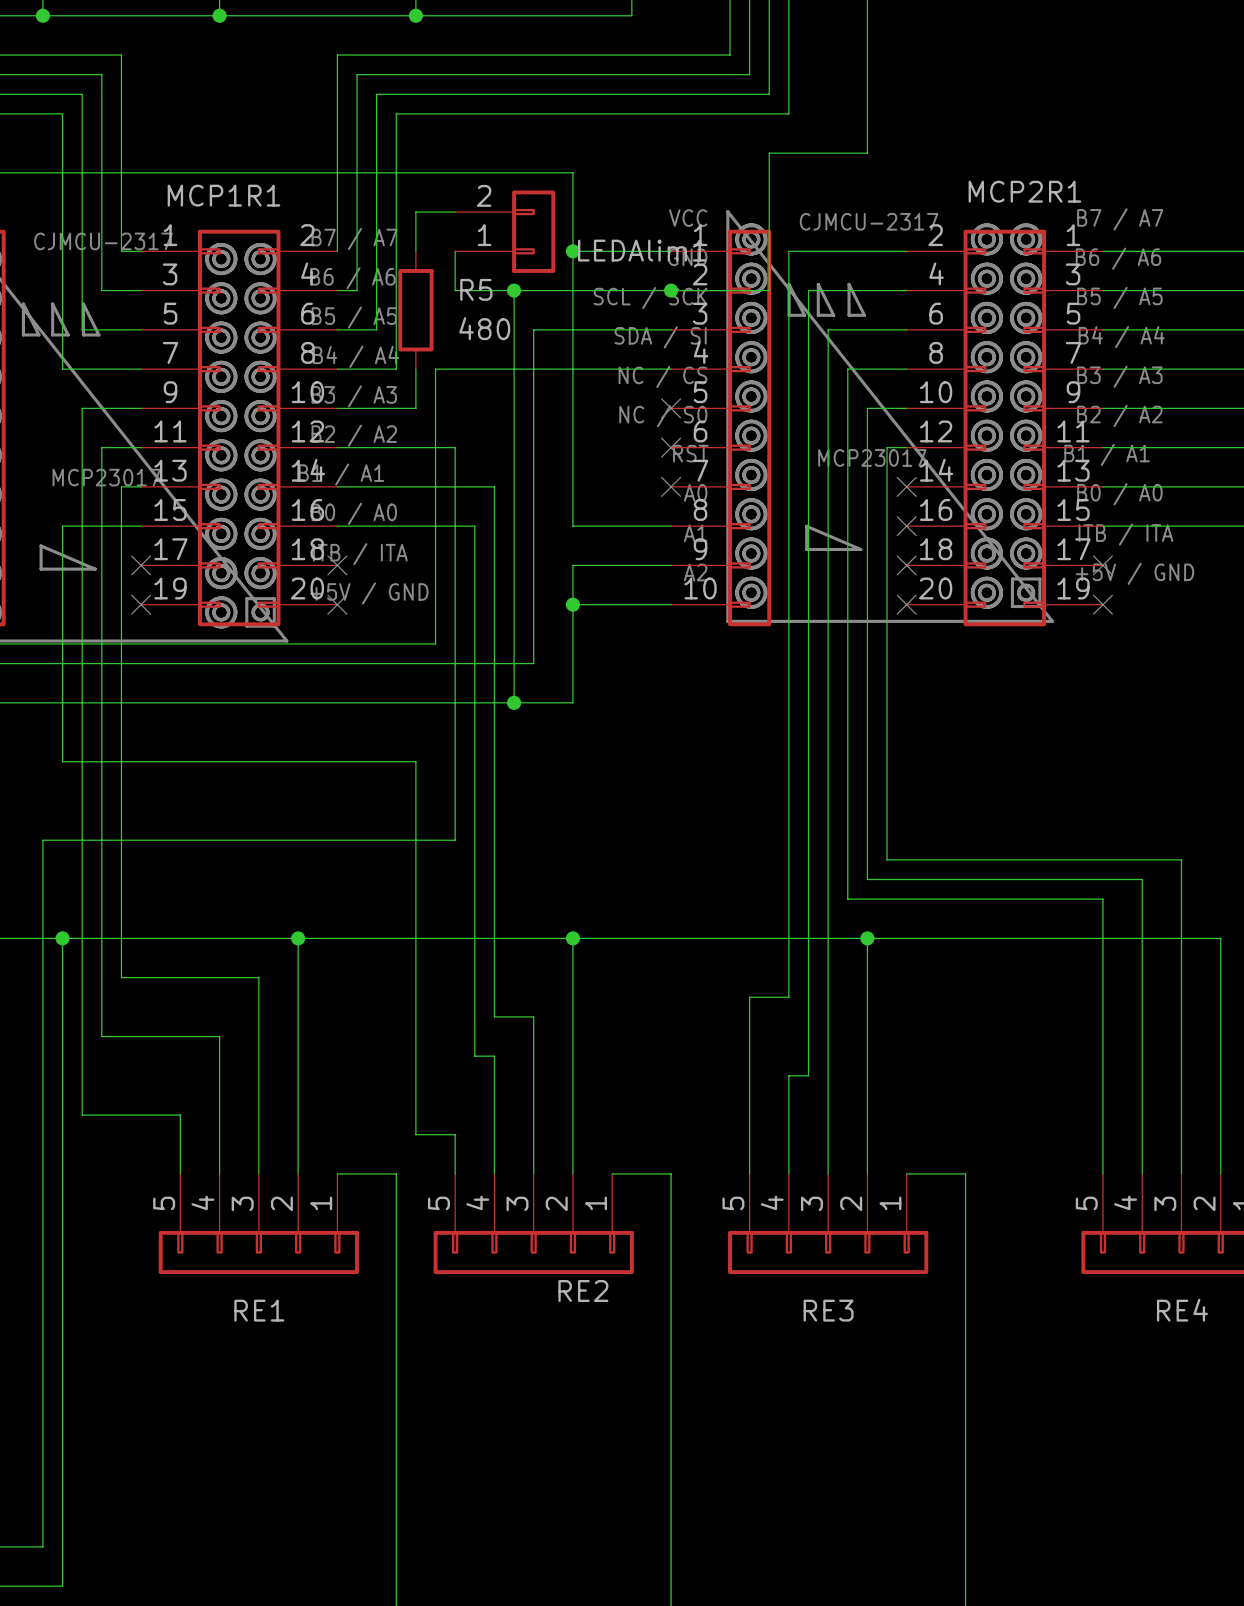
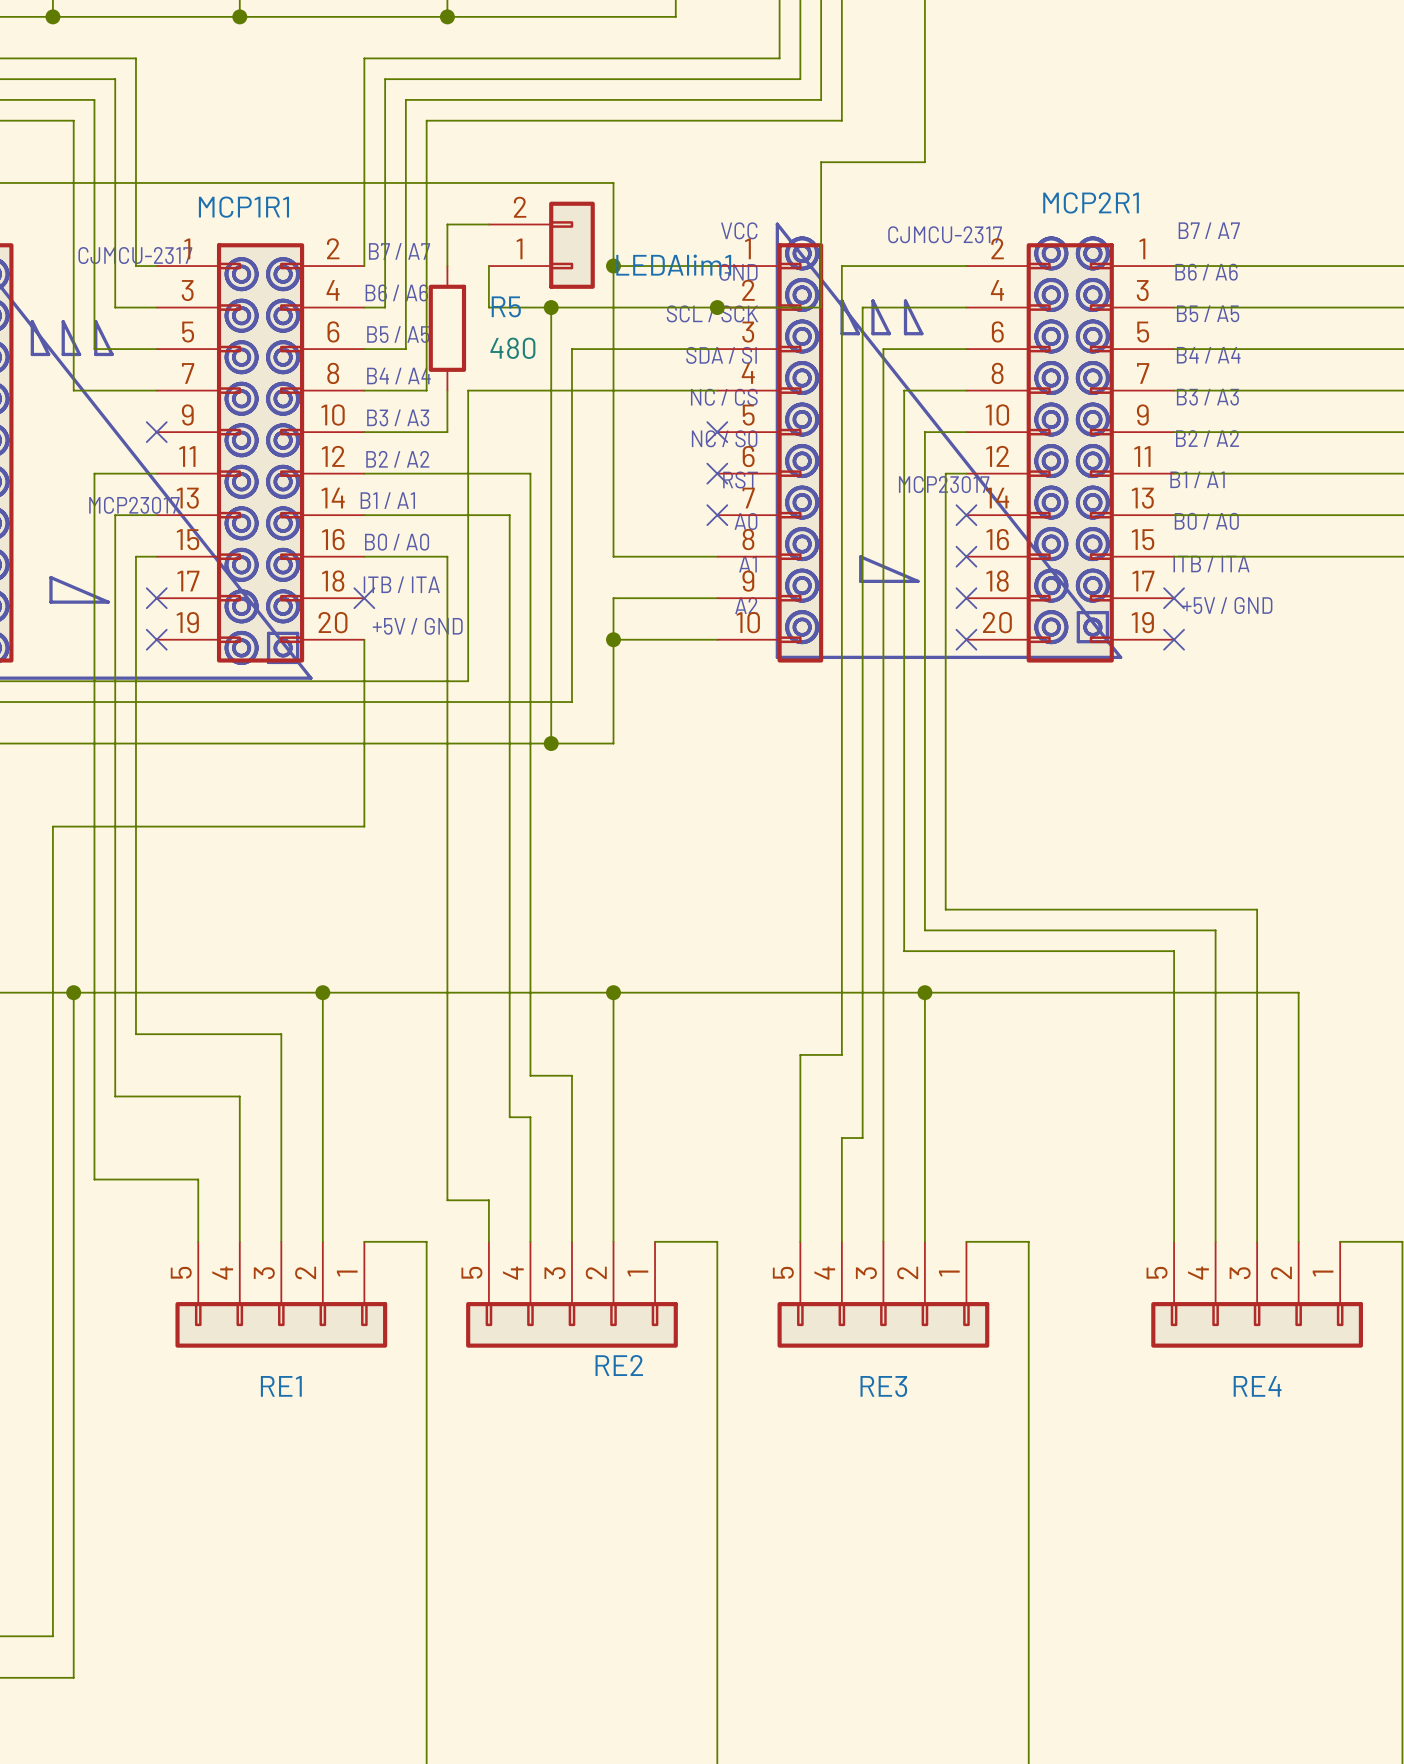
wire: (141, 408) (82, 408) (82, 447) -> (115, 473) (94, 473)
no-connect mark: none -> (156, 432)
wire: (101, 447) (101, 486) -> (135, 515) (115, 515)
wire: (455, 447) (455, 840) (42, 840) -> (364, 639) (364, 826) (52, 826) (52, 888)
wire: none -> (488, 473) (530, 473) (530, 515)
wire: (121, 486) (121, 526) (62, 526) (62, 761) (415, 761) -> none
wire: (474, 486) (494, 486) -> (509, 515) (509, 556)
wire: (415, 526) (474, 526) -> (447, 556) (447, 805)
no-connect mark: (337, 604) -> none

